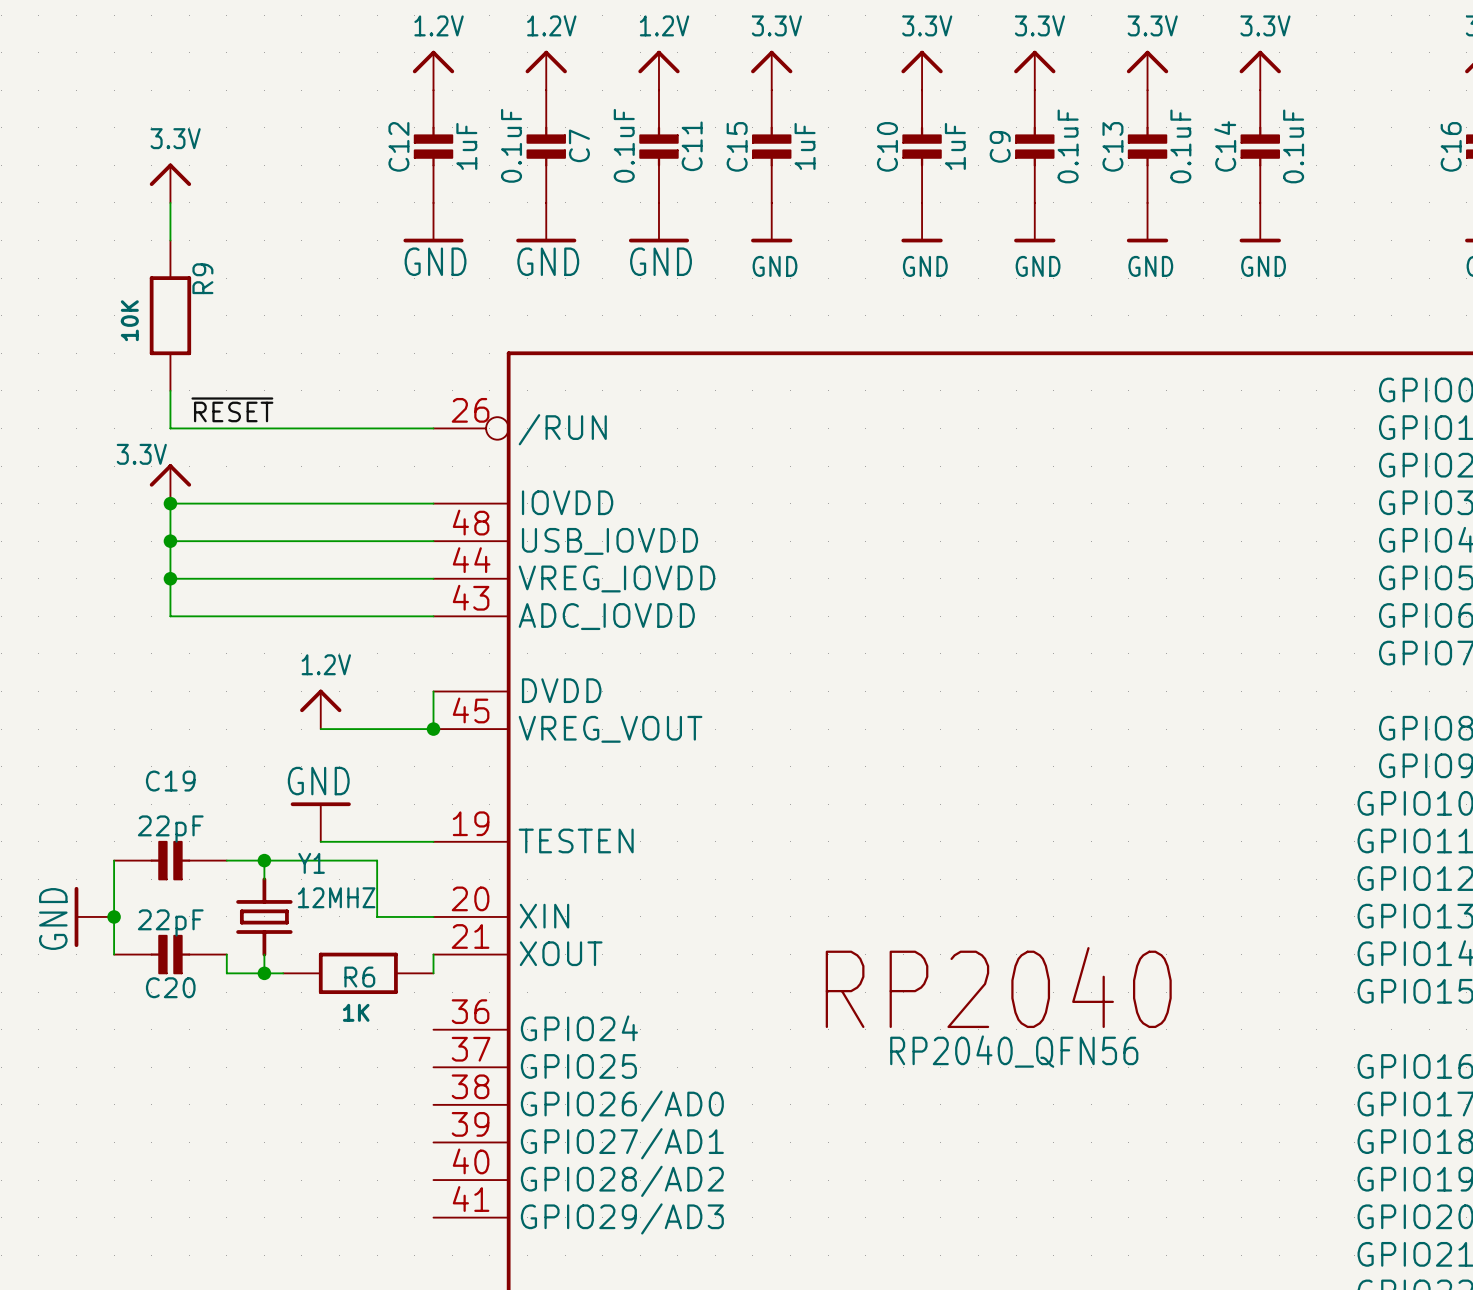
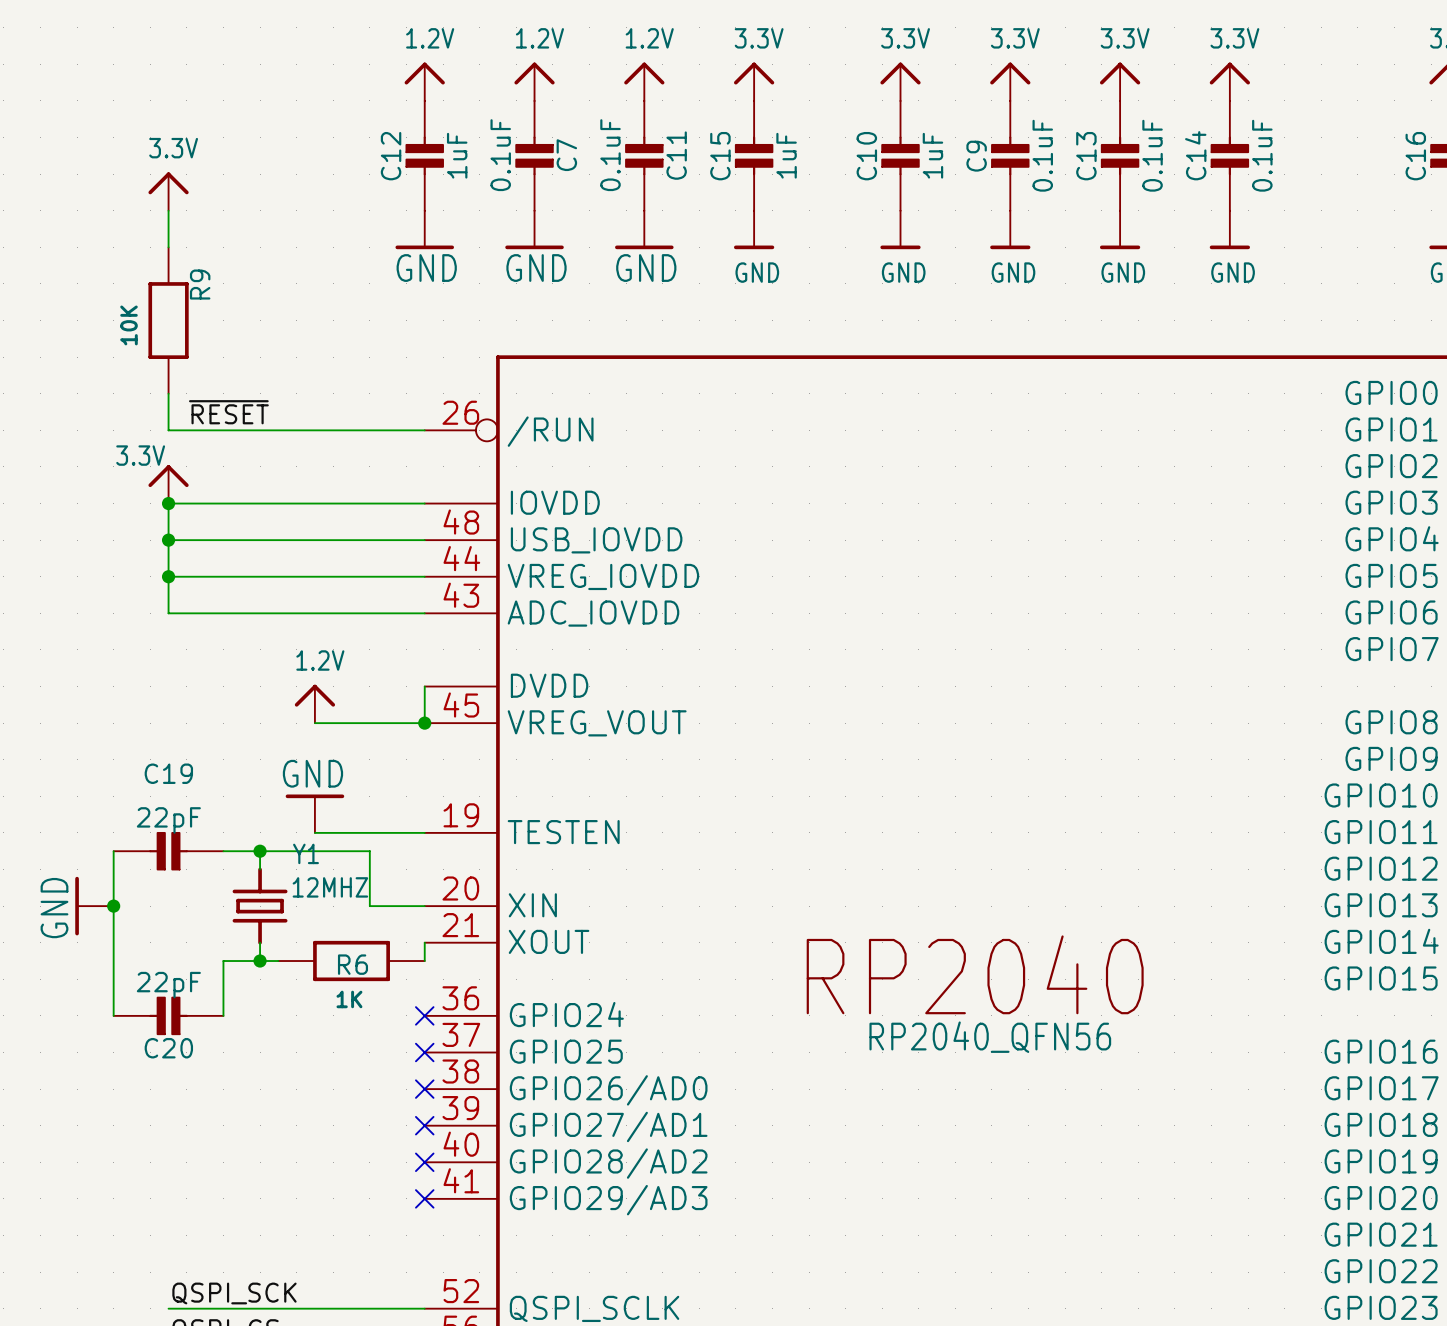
wire: none -> (113, 942) (113, 1015)
C20 position: (170, 954) -> (168, 1015)
wire: (226, 954) (226, 973) -> (223, 1015) (223, 961)
no-connect mark: none -> (424, 1015)
no-connect mark: none -> (424, 1052)
no-connect mark: none -> (424, 1089)
no-connect mark: none -> (424, 1125)
no-connect mark: none -> (424, 1162)
no-connect mark: none -> (424, 1198)

